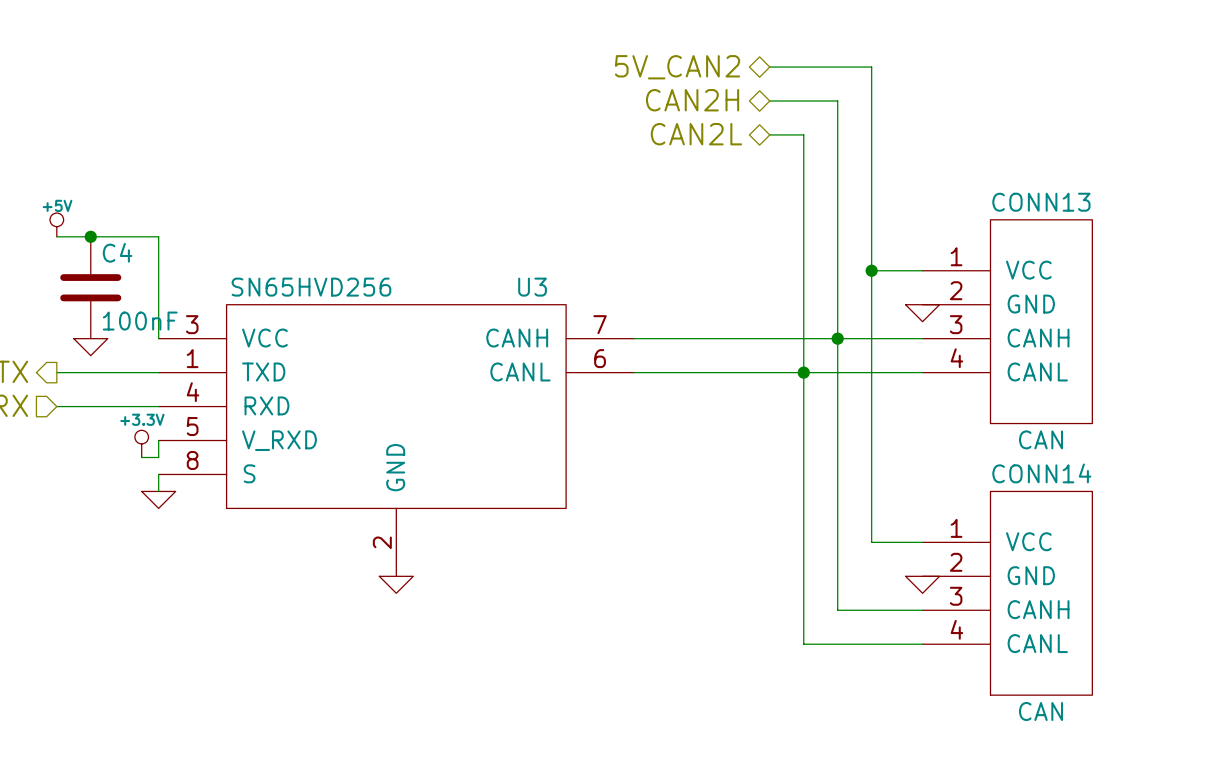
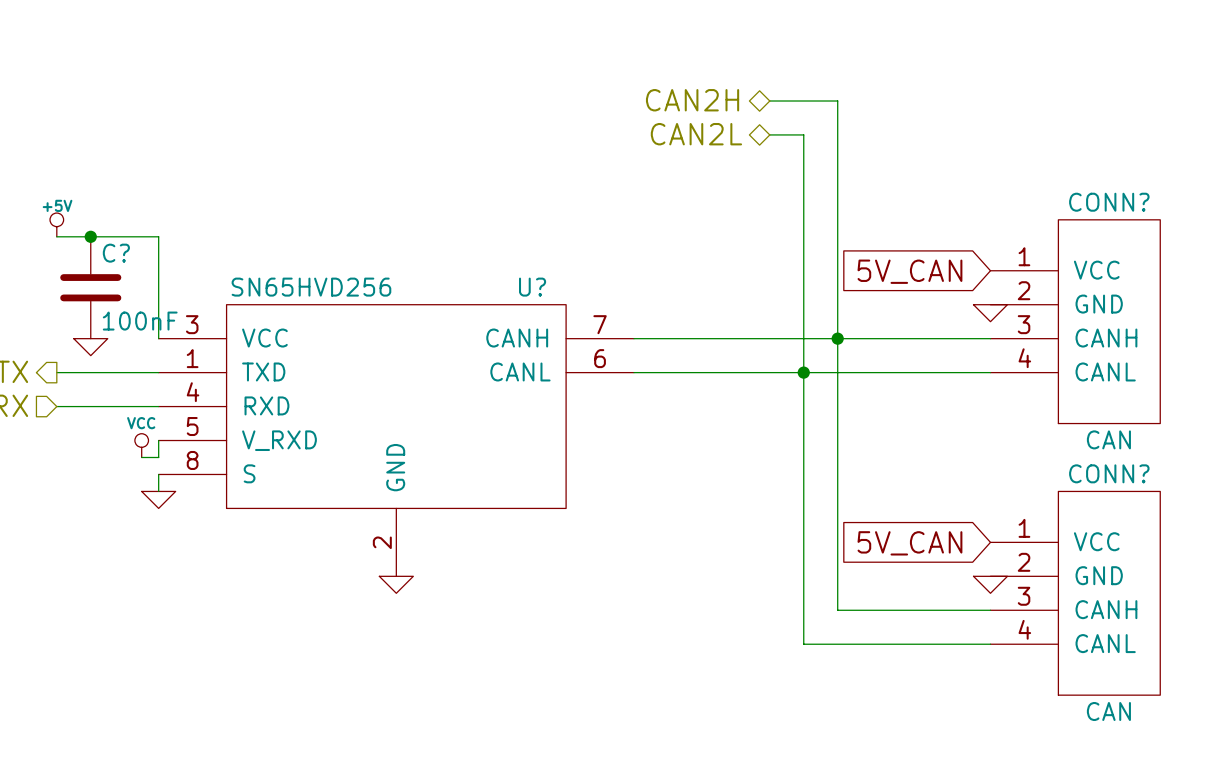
hierarchical label: 5V_CAN2 (677, 67) -> none
wire: (769, 67) (871, 67) (871, 542) (922, 542) -> none
C4 name: C4 (117, 252) -> C? (116, 253)
wire: (871, 270) (922, 270) -> none
junction: (871, 270) -> none
global label: none -> 5V_CAN (909, 271)
U3 name: U3 (532, 287) -> U? (532, 287)
power symbol position: (922, 313) -> (990, 313)
CONN13: CAN (1007, 321) -> none
CONN?: none -> CAN (1075, 321)
power symbol: +3.3V (141, 443) -> VCC (141, 445)
global label: none -> 5V_CAN (909, 543)
power symbol position: (922, 584) -> (990, 584)
CONN14: CAN (1007, 593) -> none
CONN?: none -> CAN (1075, 593)

